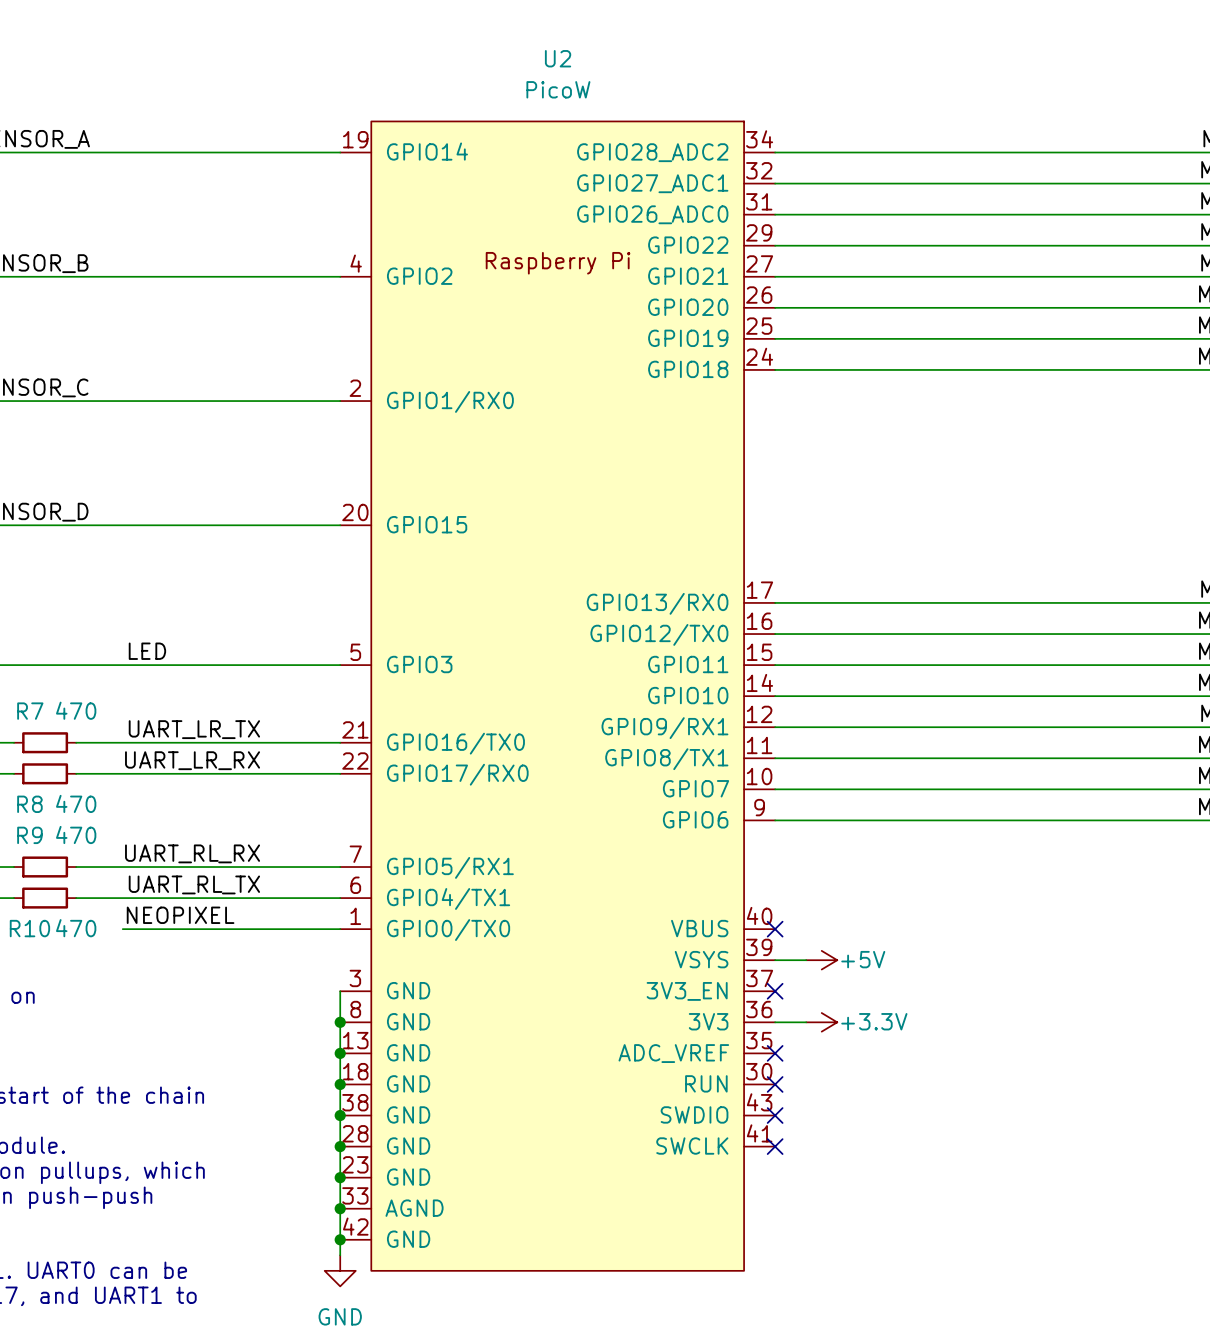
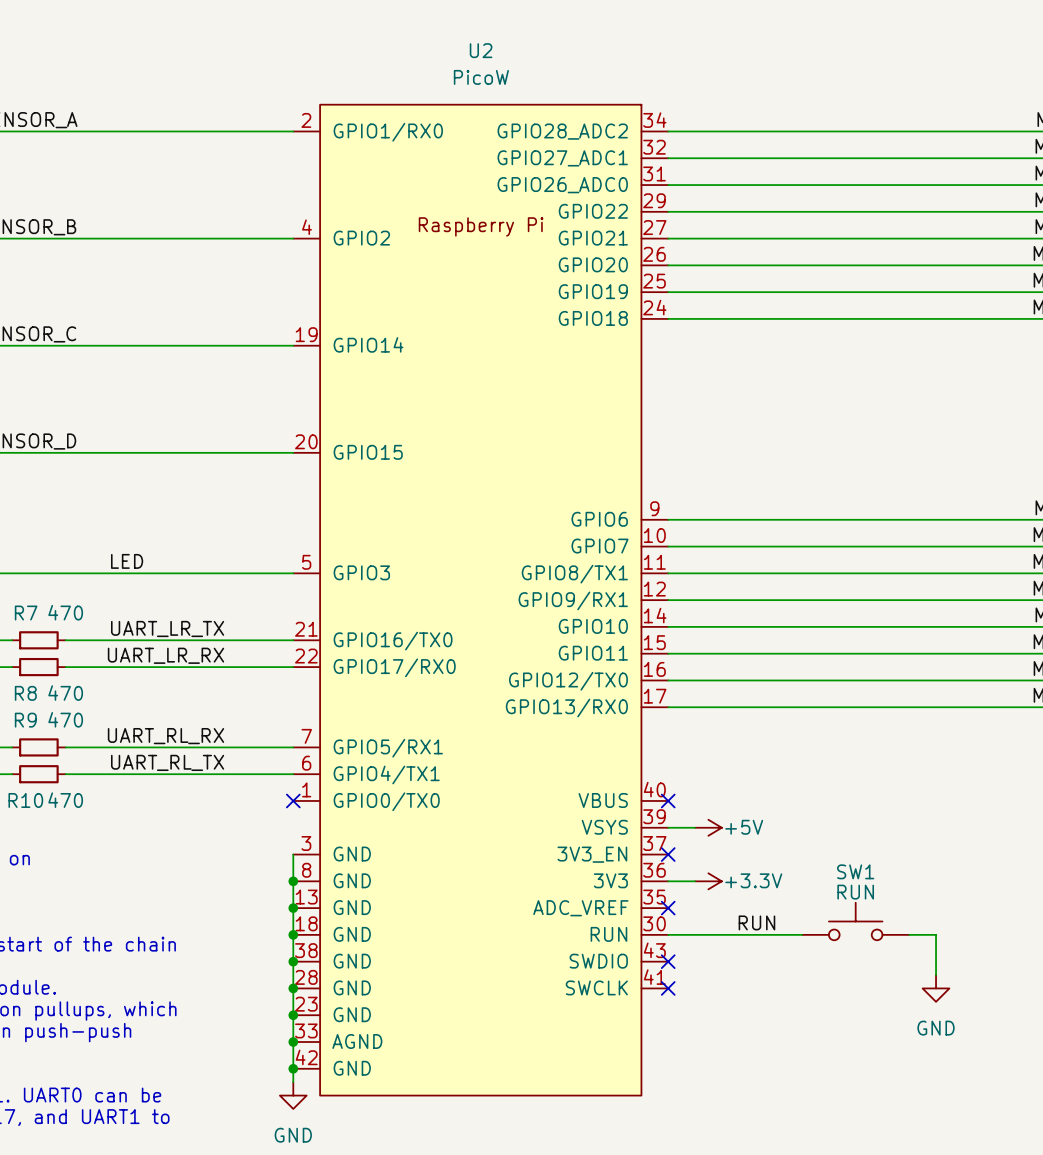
U2 symbol: [340, 121, 776, 1271] -> [293, 104, 669, 1096]
label: NEOPIXEL (180, 915) -> none
wire: (122, 929) (340, 929) -> none
no-connect mark: none -> (293, 800)
SW1: none -> RUN (855, 921)
label: none -> RUN (756, 922)
wire: none -> (668, 934) (802, 934)
no-connect mark: (775, 1084) -> none
wire: none -> (909, 934) (936, 934) (936, 975)
power symbol: none -> GND (936, 988)

